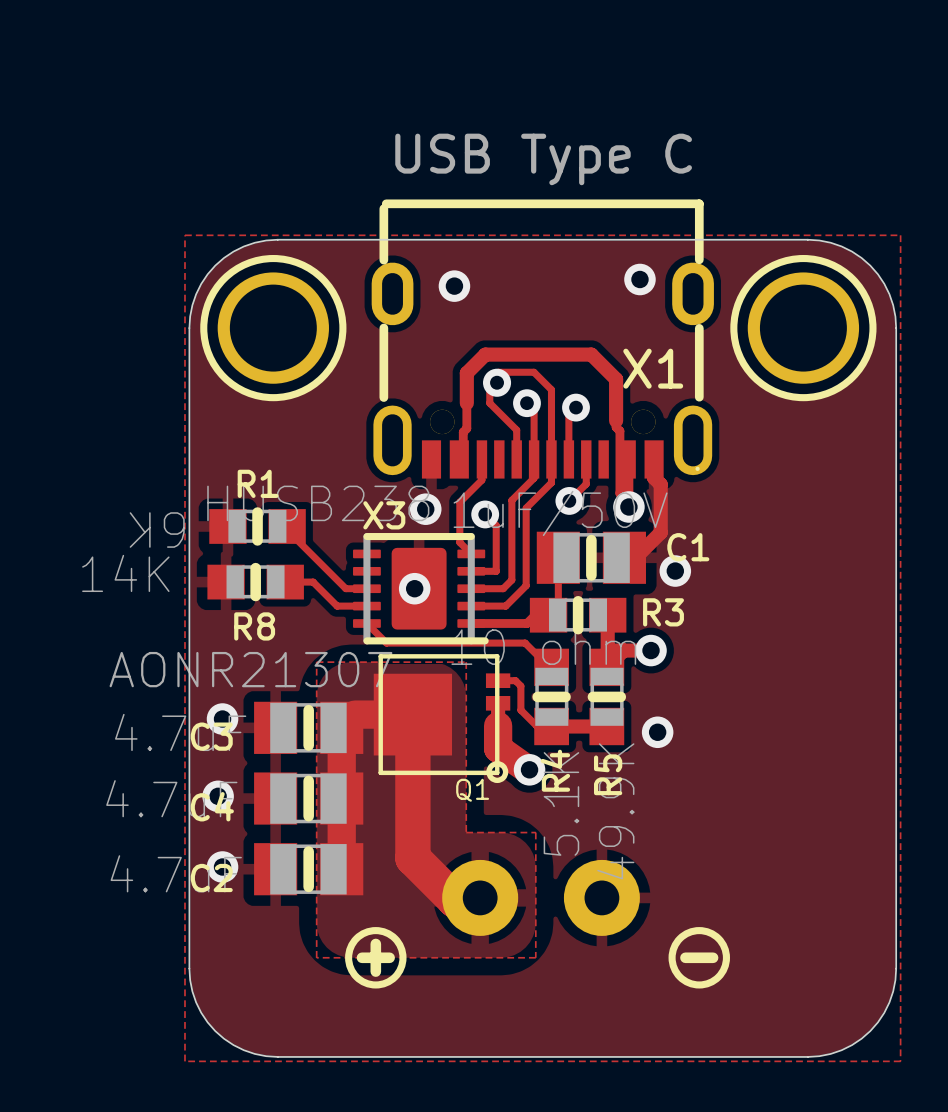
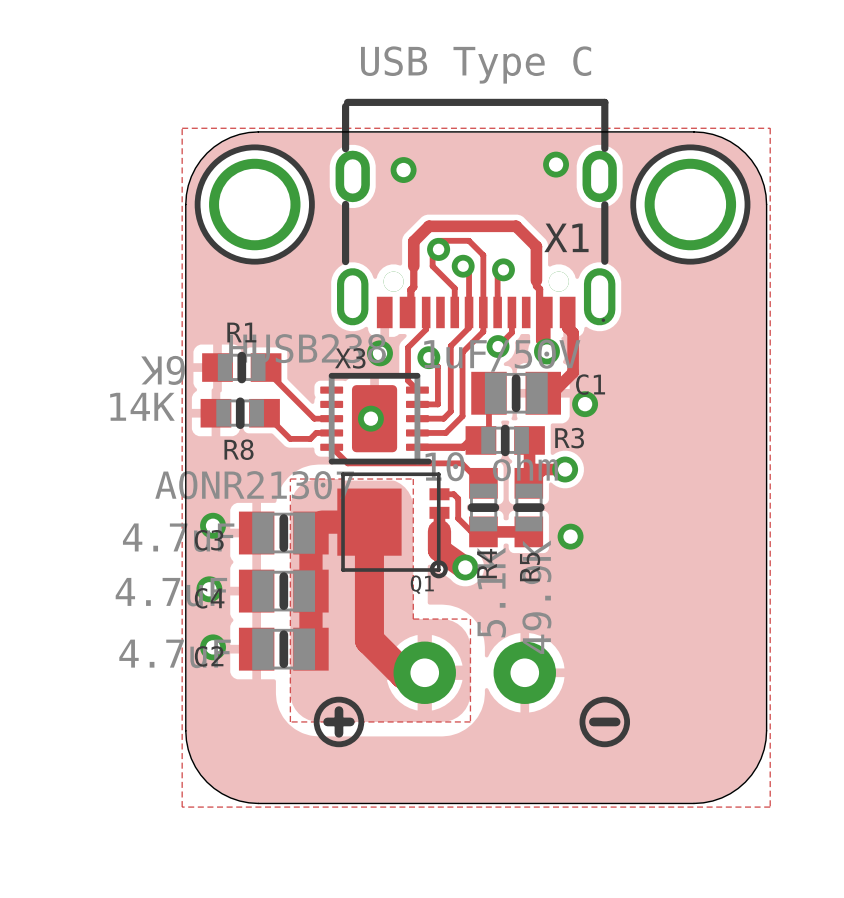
track: (285, 582) (313, 582) (337, 606) (348, 606) -> (264, 413) (290, 438) (310, 438) (316, 432)

